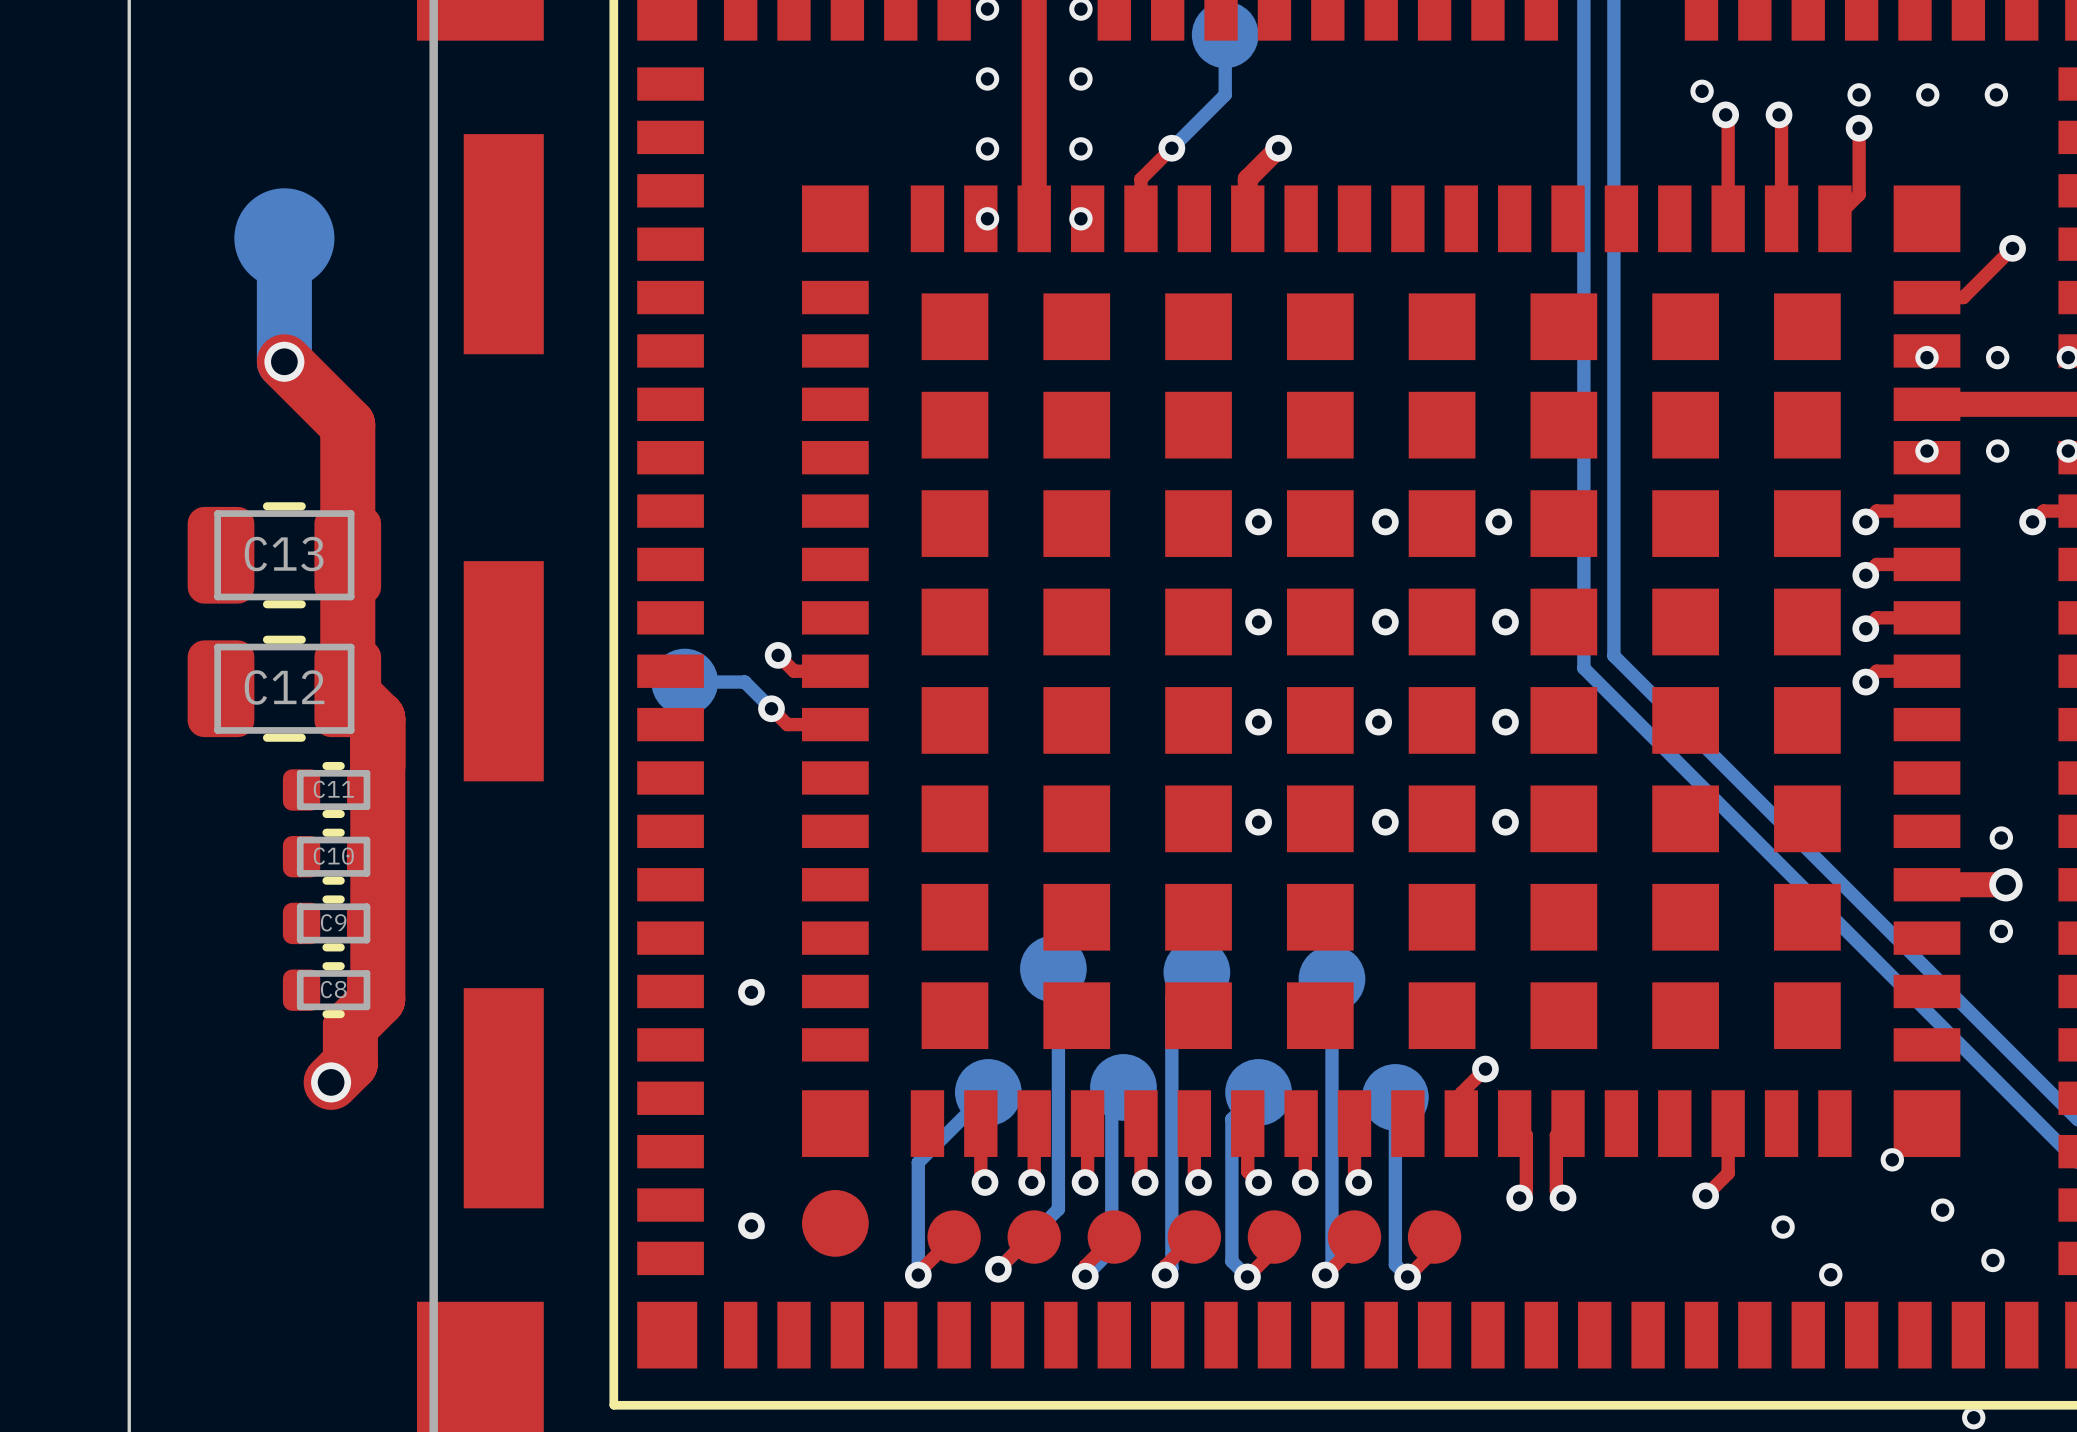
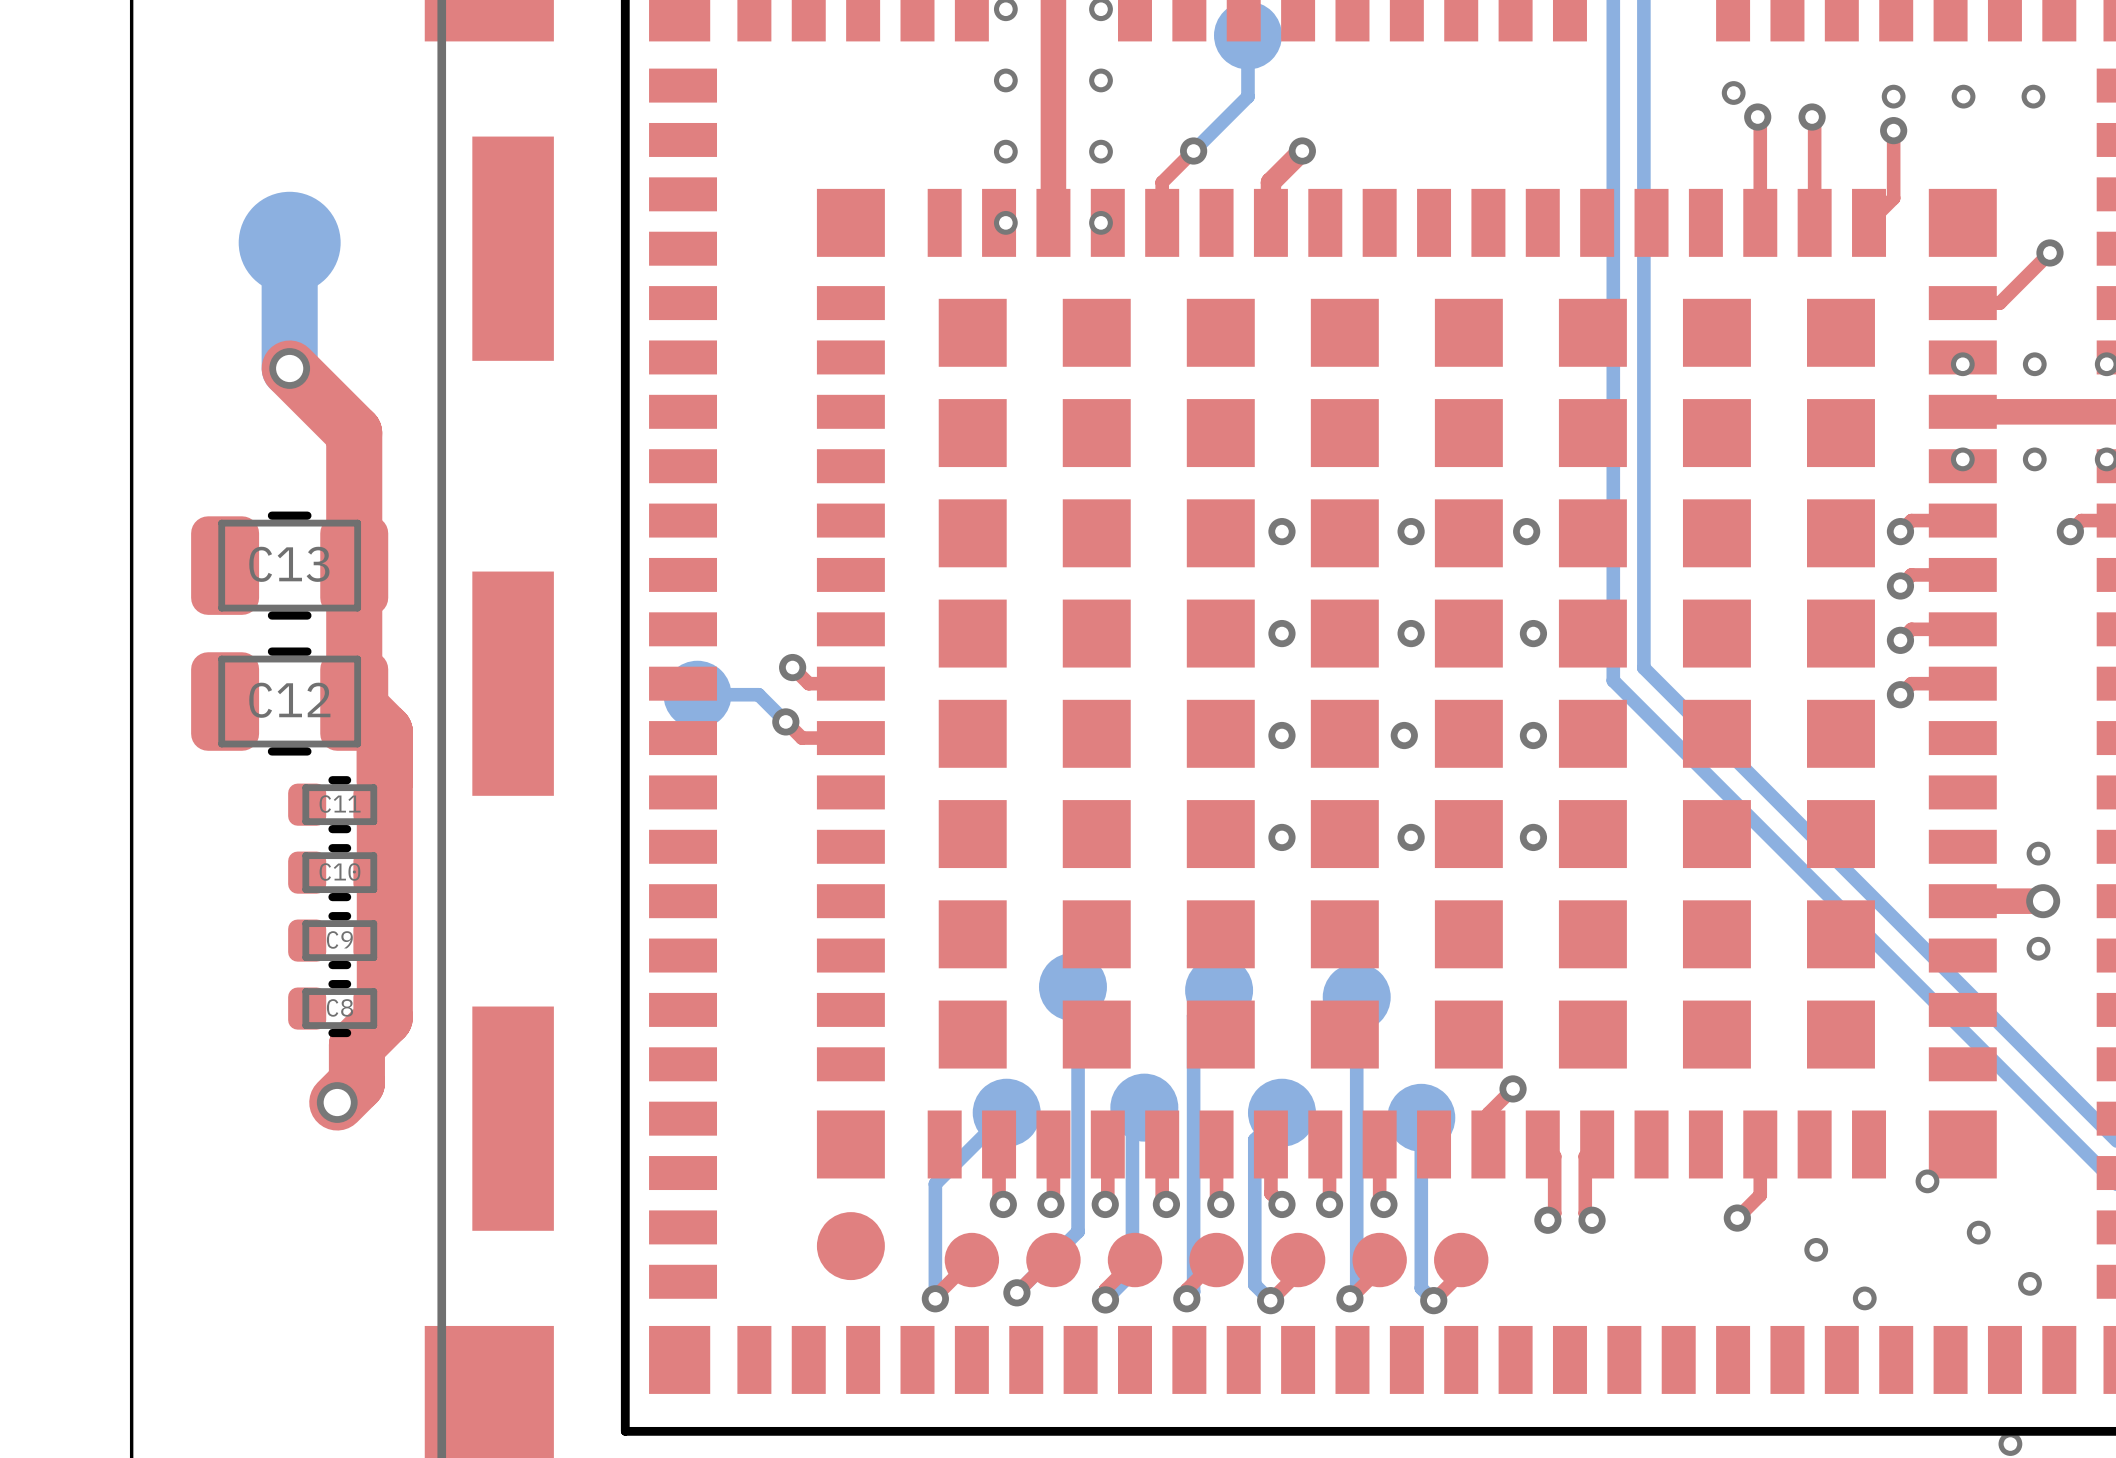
via: (751, 992) -> none
via: (751, 1225) -> none

